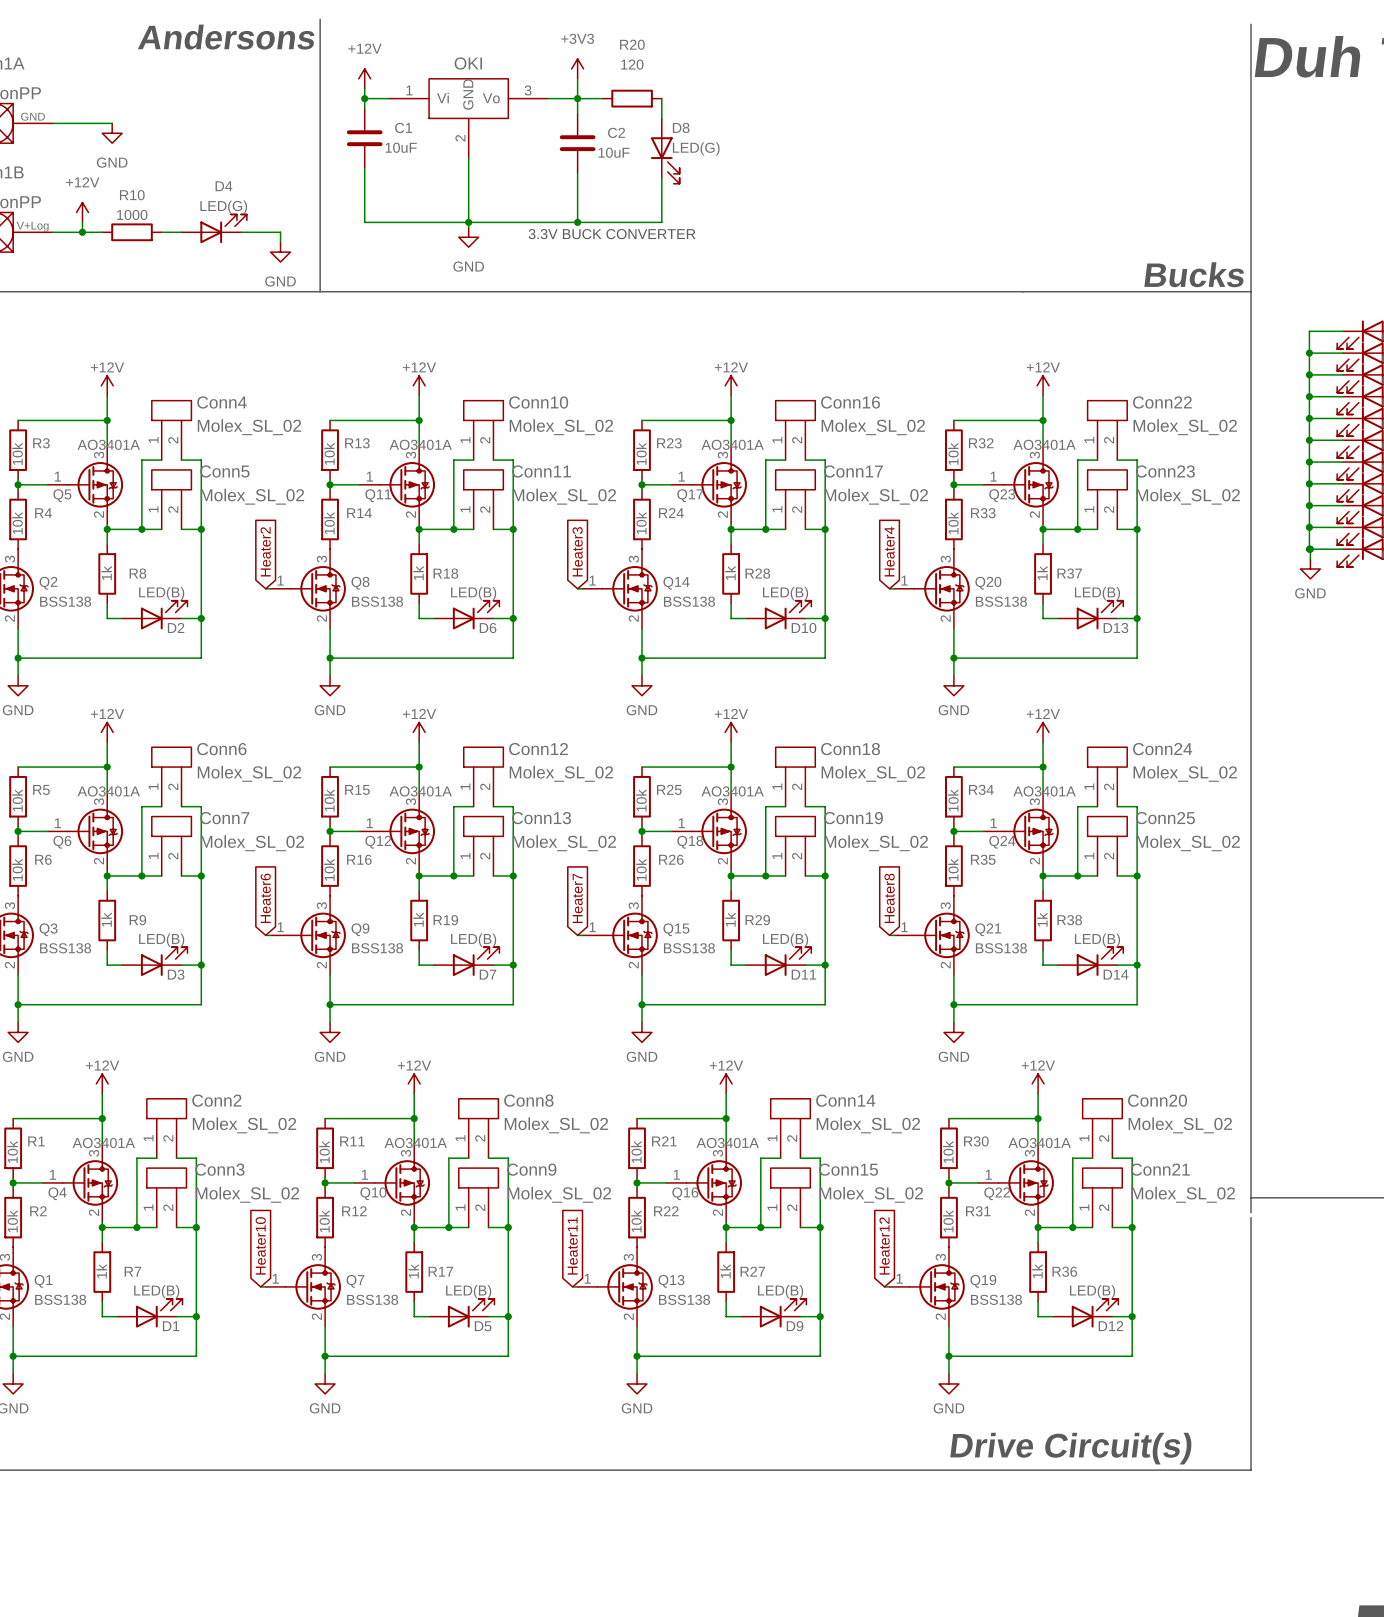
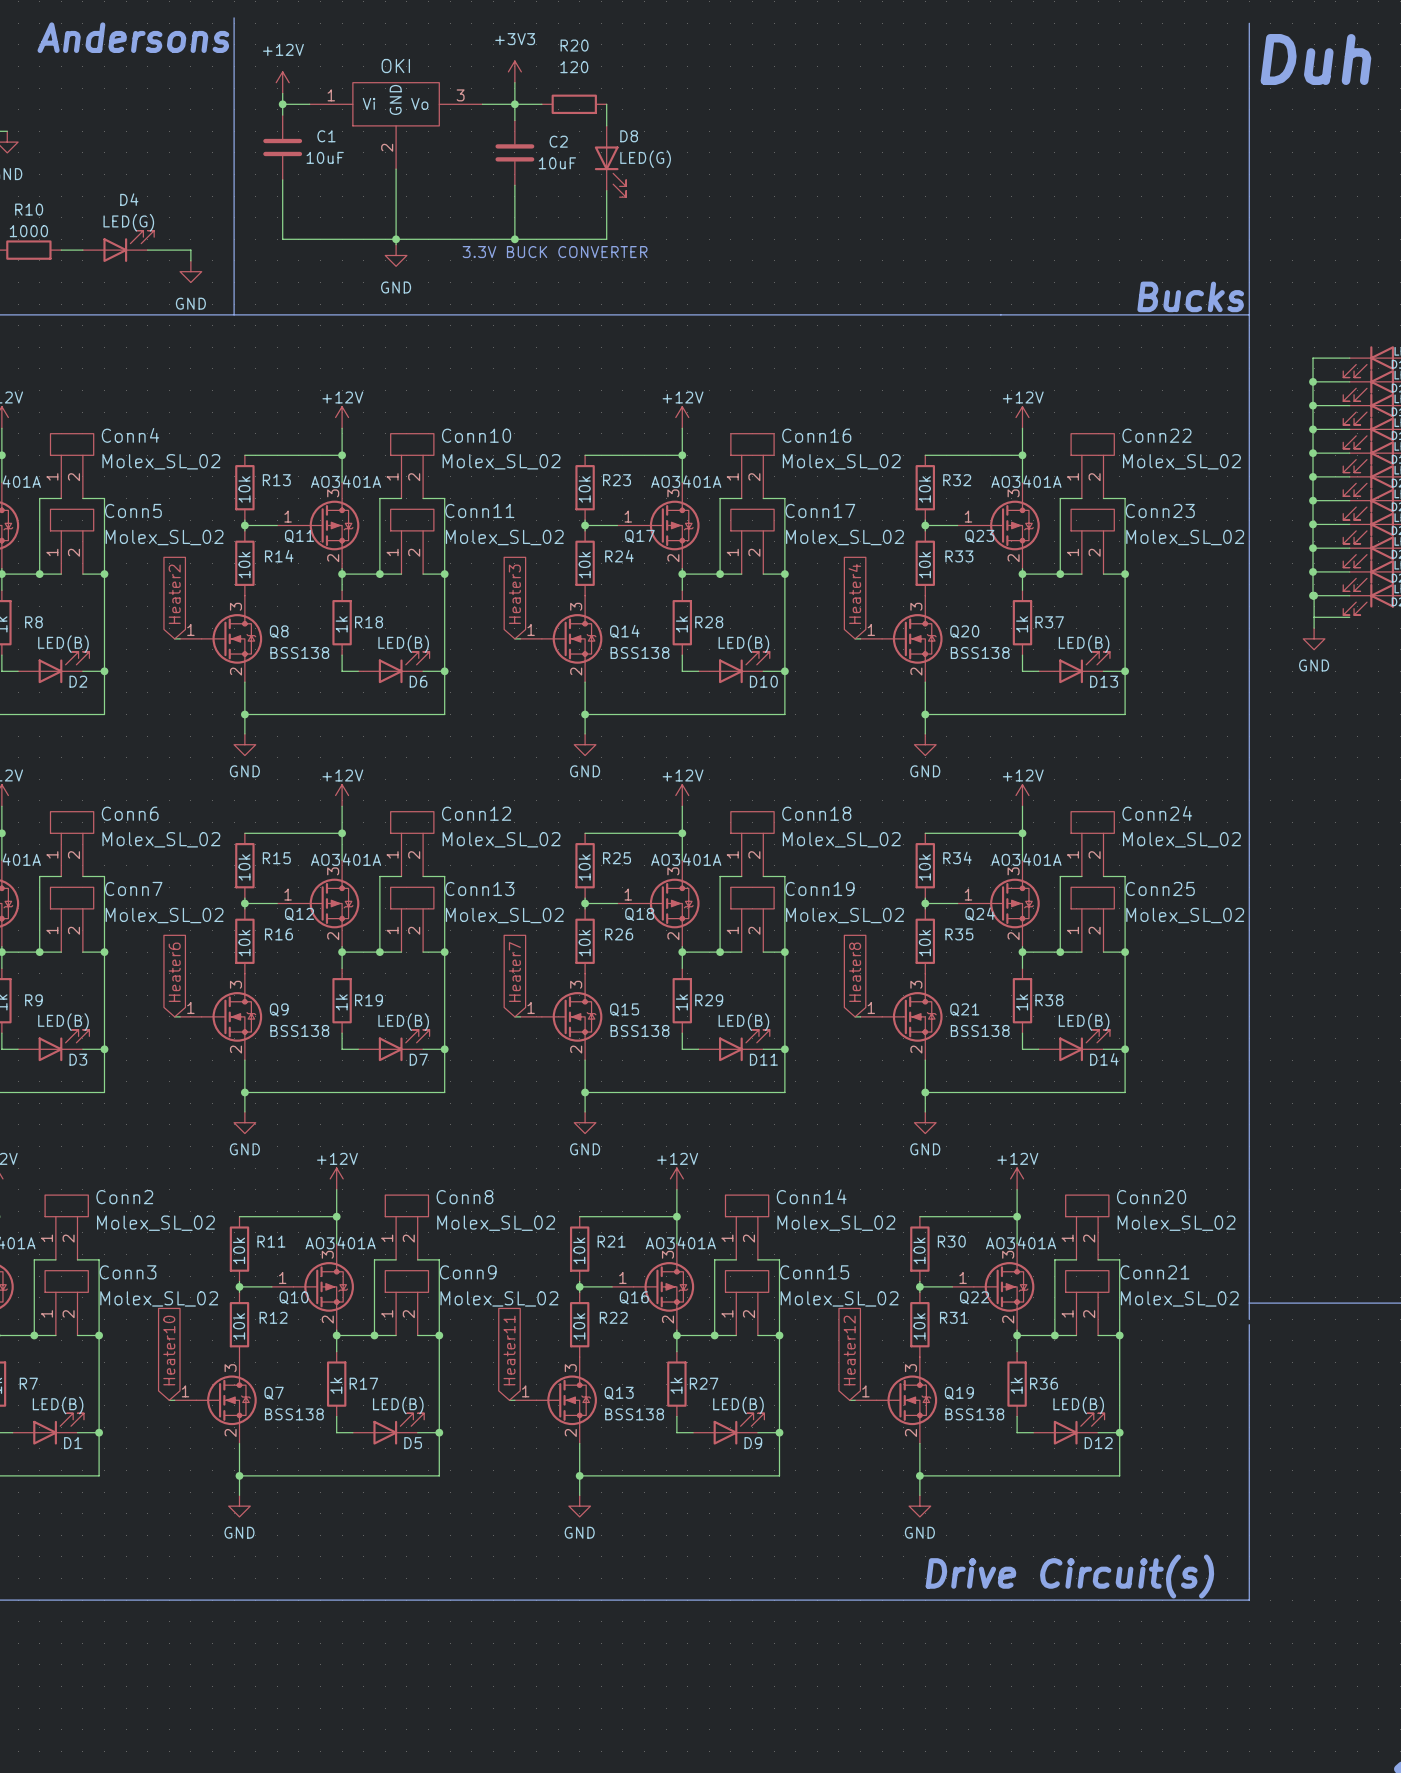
wire: none -> (1314, 617) (1349, 617)
power symbol position: GND (1310, 568) -> GND (1314, 638)

